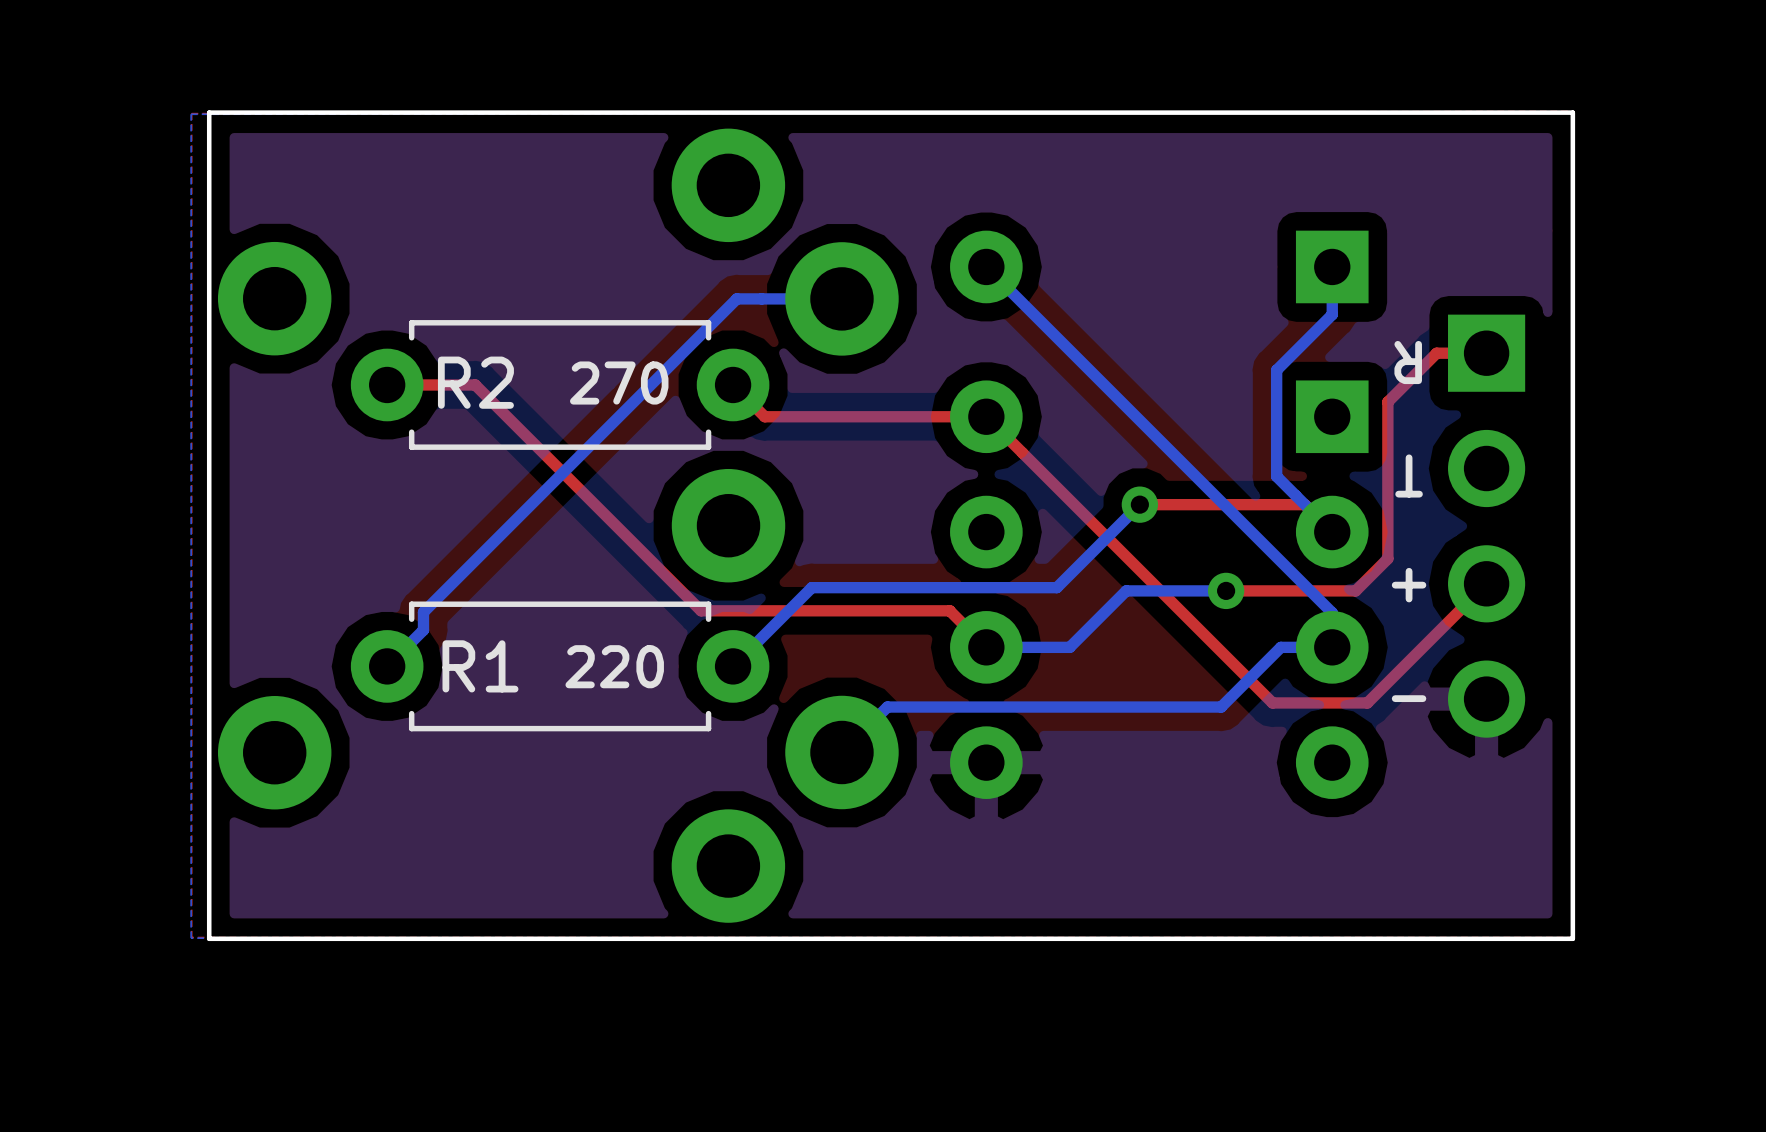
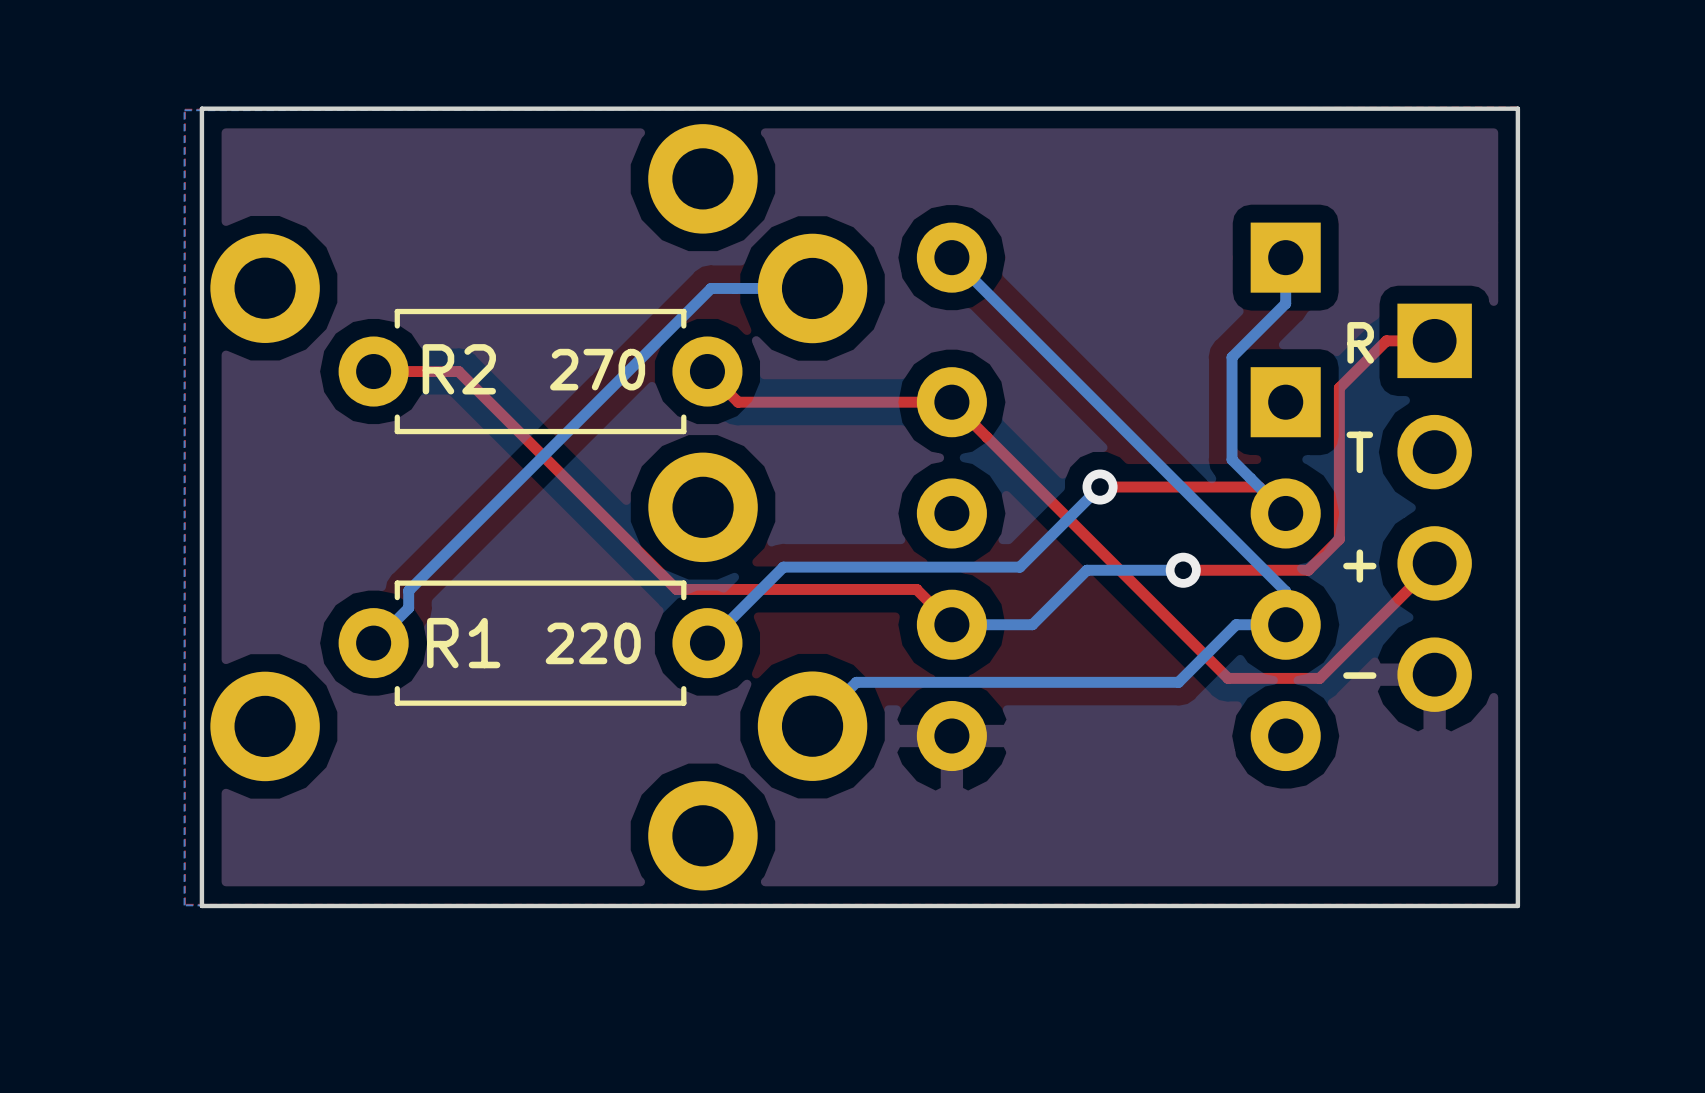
text rotation: 0° (1408, 362) -> 180° (1360, 342)
text rotation: 0° (1409, 475) -> 180° (1359, 452)
text rotation: 0° (1409, 585) -> 180° (1359, 566)
text rotation: 0° (1409, 698) -> 180° (1359, 675)

